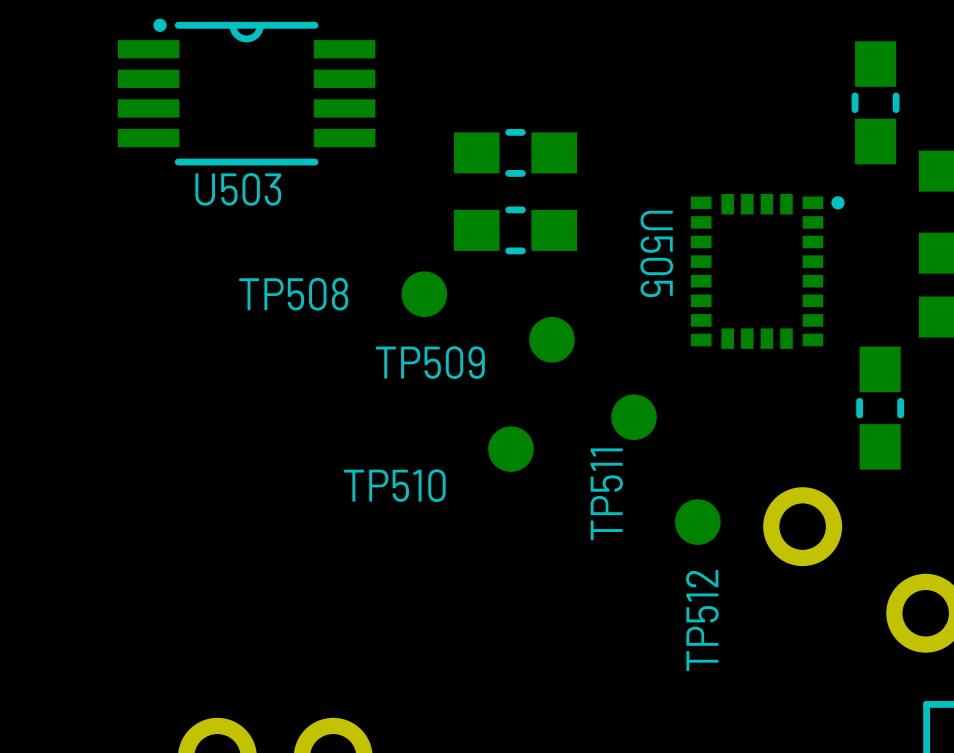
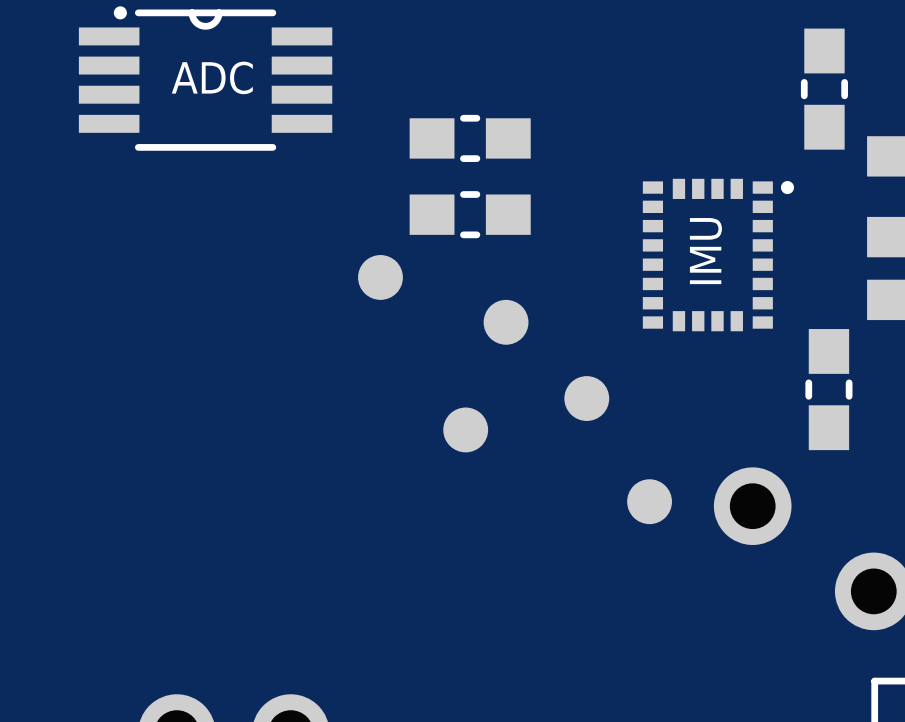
text: none -> ADC (212, 77)
U503 name: U503 (238, 189) -> none
U505 name: U505 (656, 253) -> none
text: none -> IMU (705, 251)
TP508 name: TP508 (293, 294) -> none
TP509 name: TP509 (430, 362) -> none
TP510 name: TP510 (394, 485) -> none
TP511 name: TP511 (606, 494) -> none
TP512 name: TP512 (702, 620) -> none

